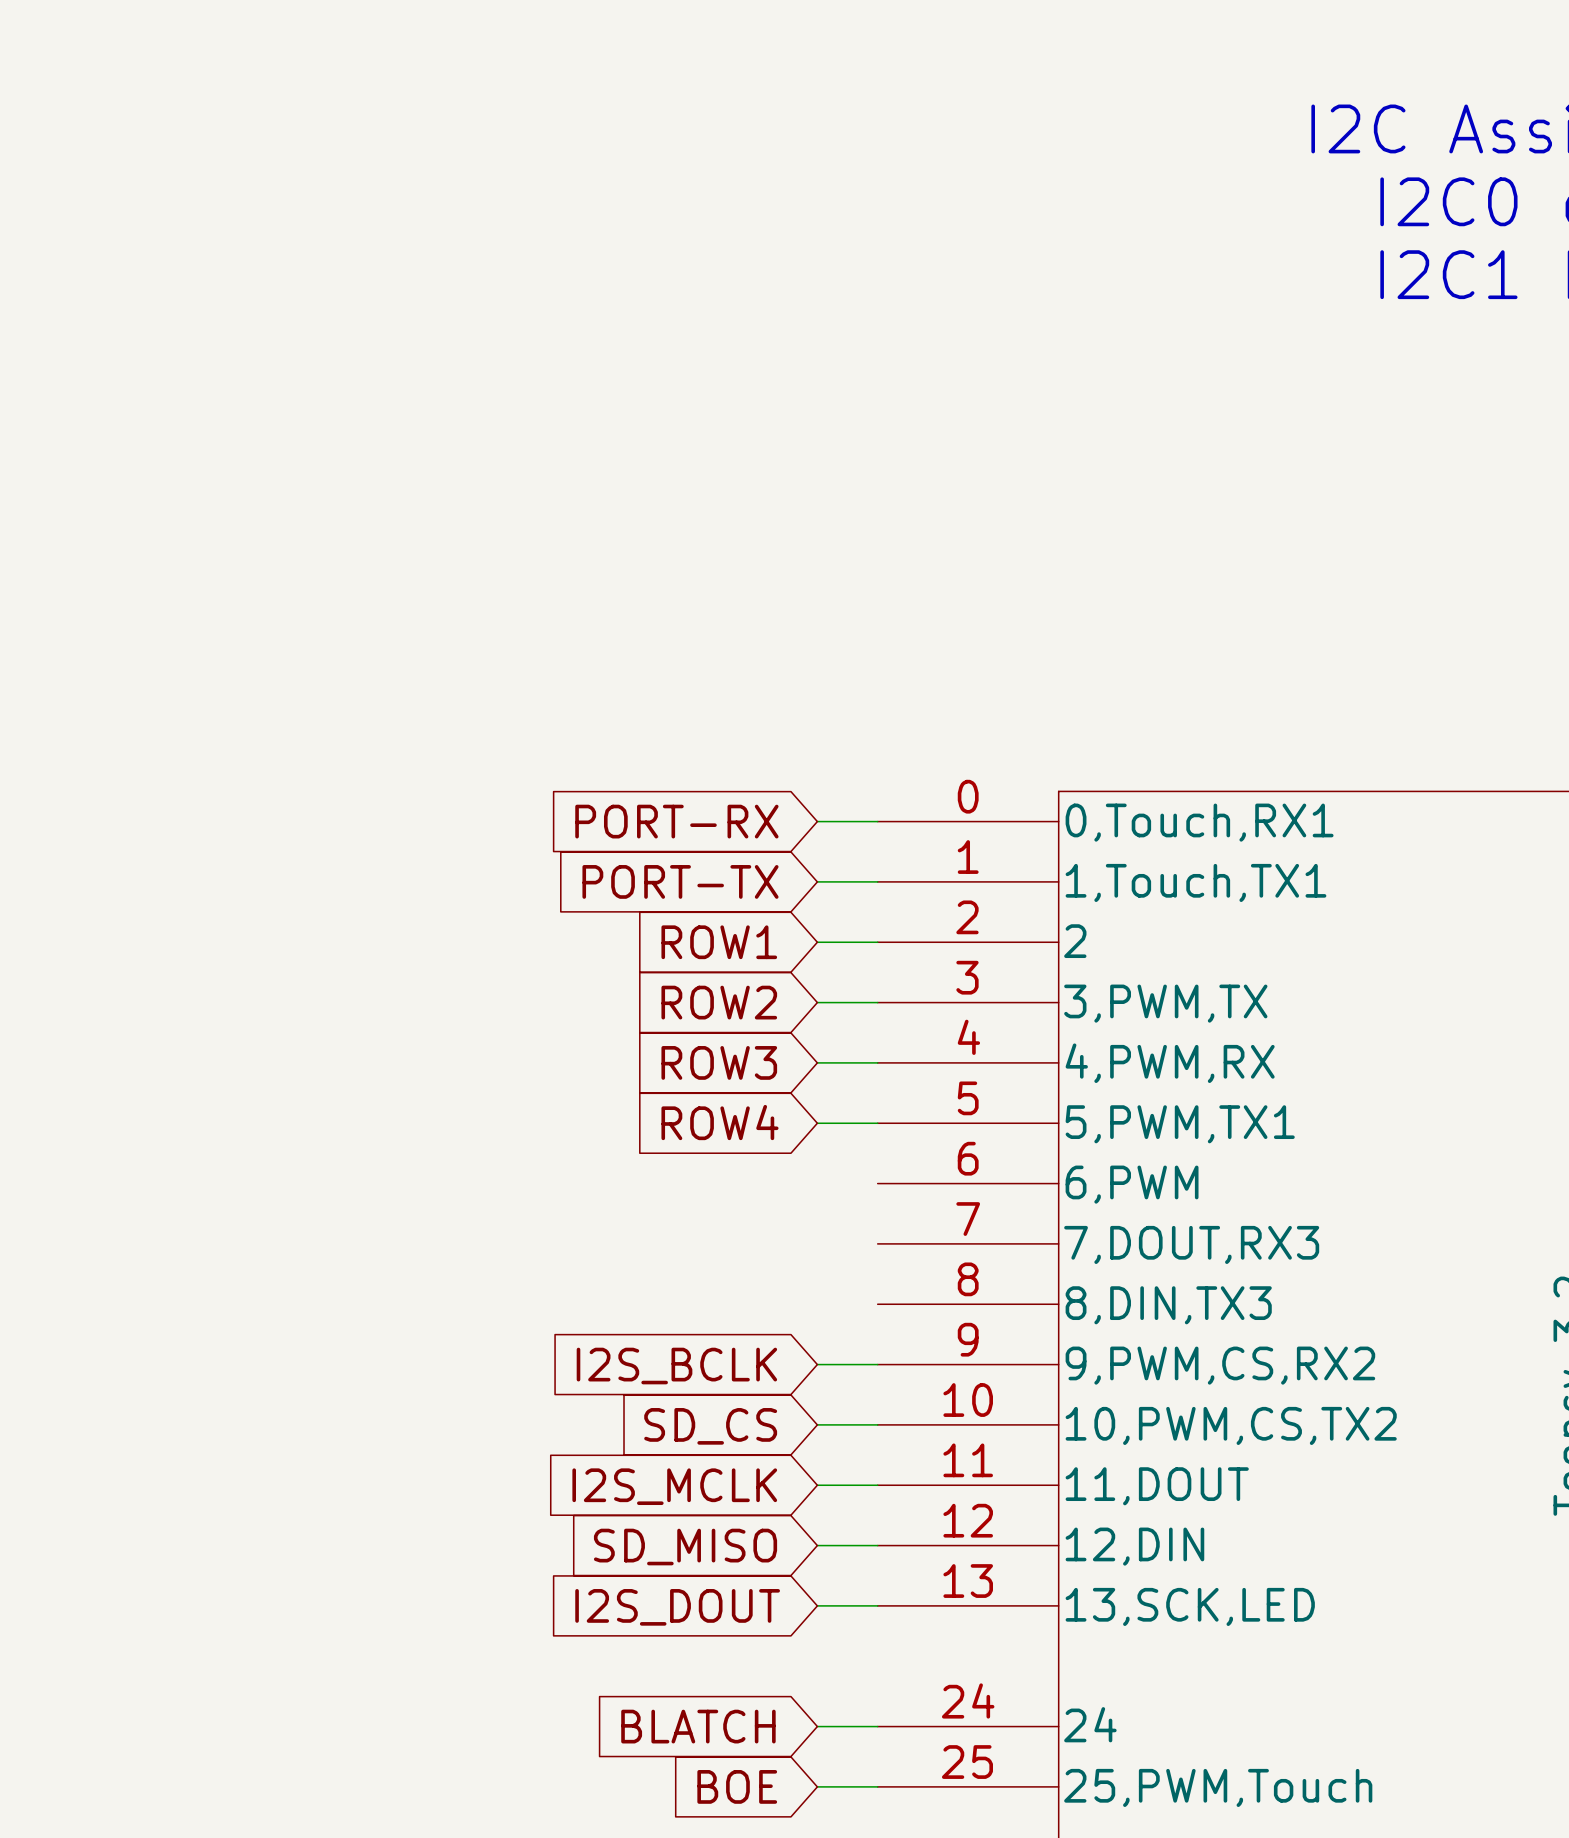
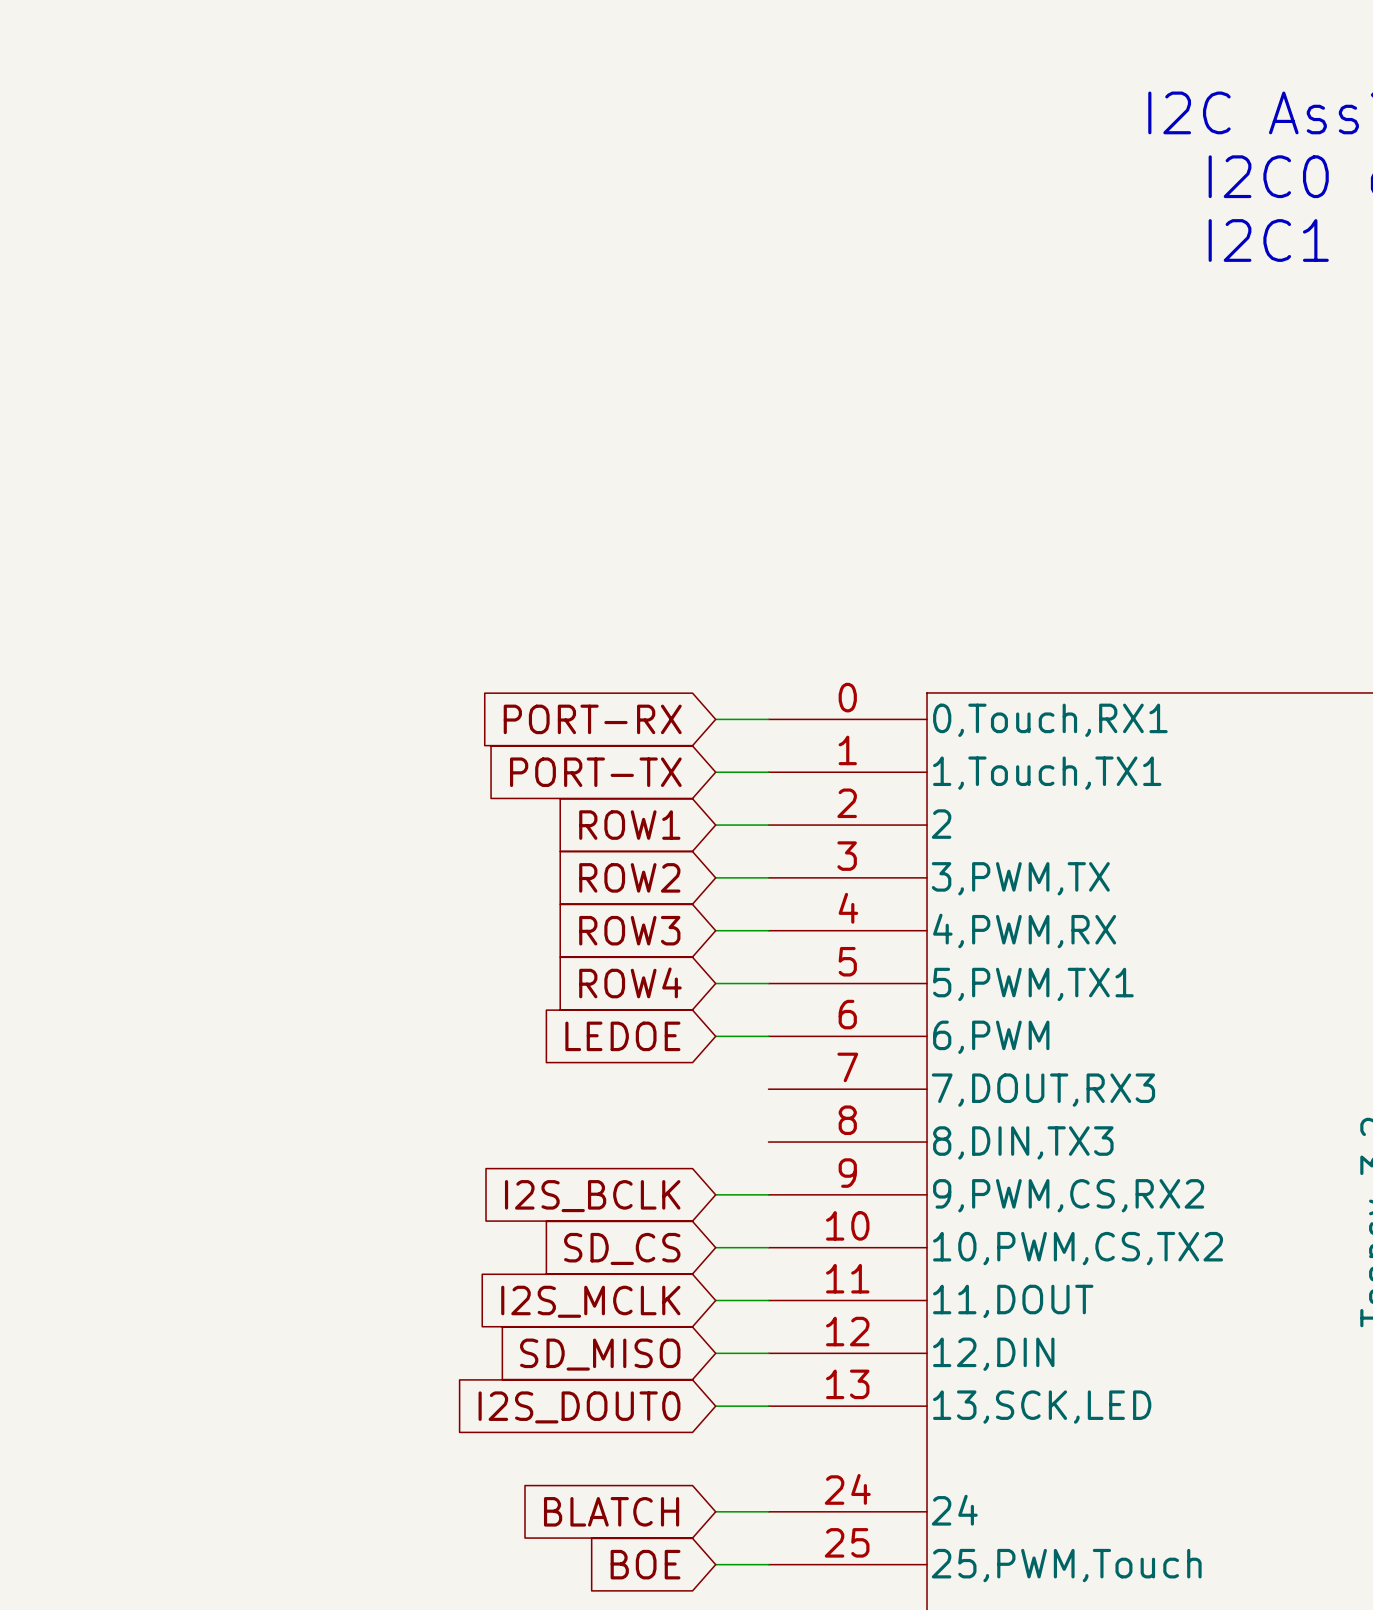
global label: none -> LEDOE (622, 1036)
wire: none -> (715, 1036) (768, 1036)
global label: I2S_DOUT (677, 1607) -> I2S_DOUT0 (579, 1407)

